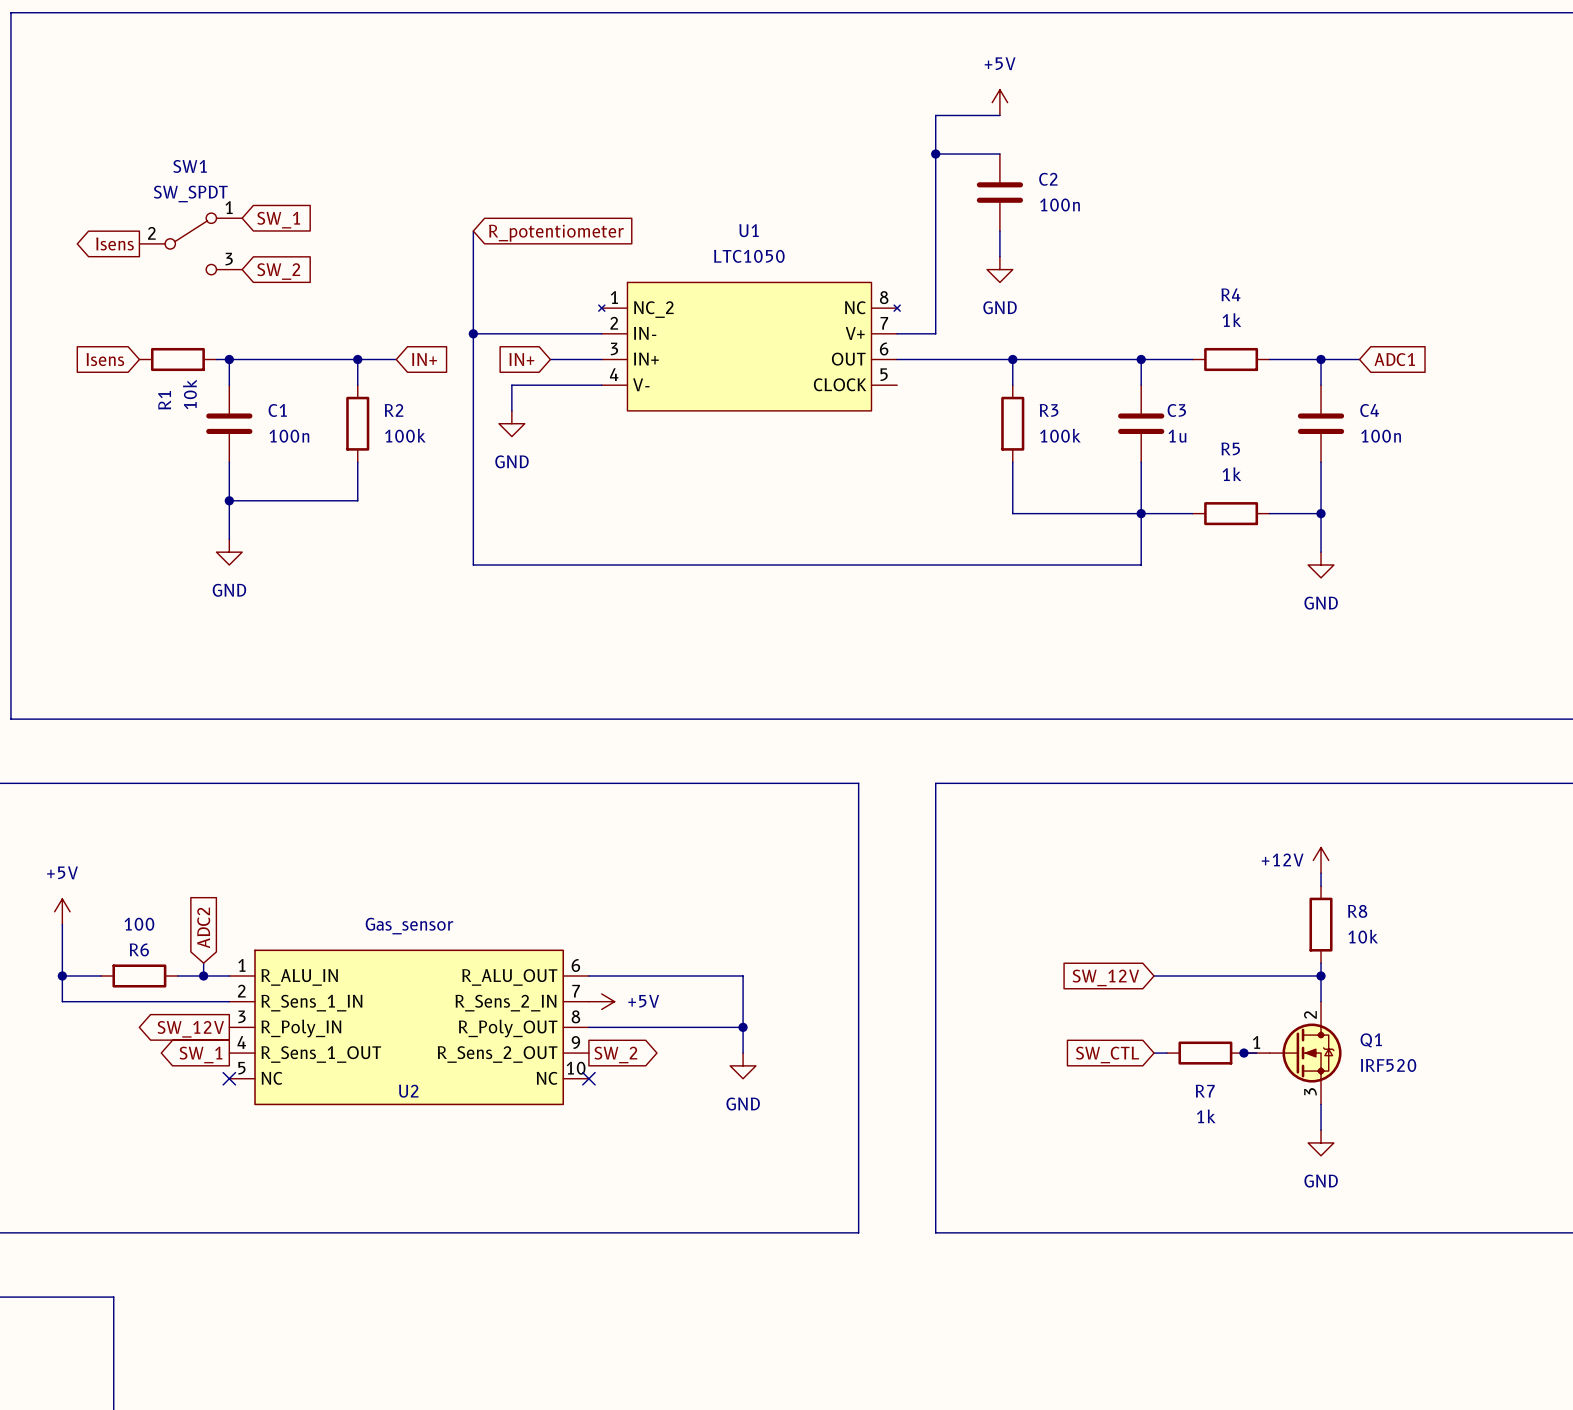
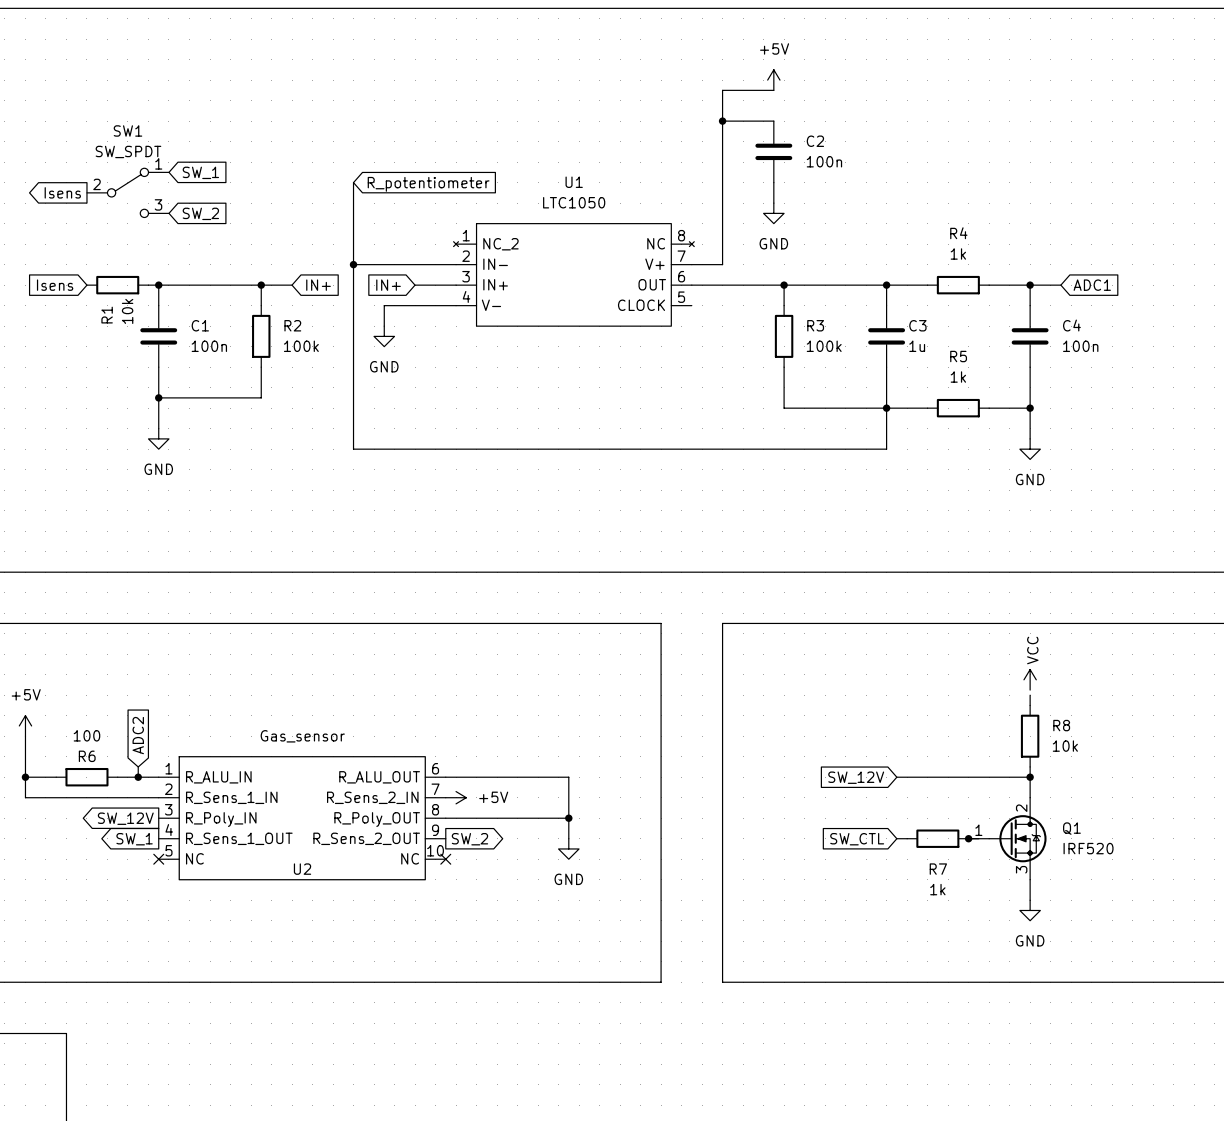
power symbol: +12V (1321, 860) -> VCC (1030, 679)

